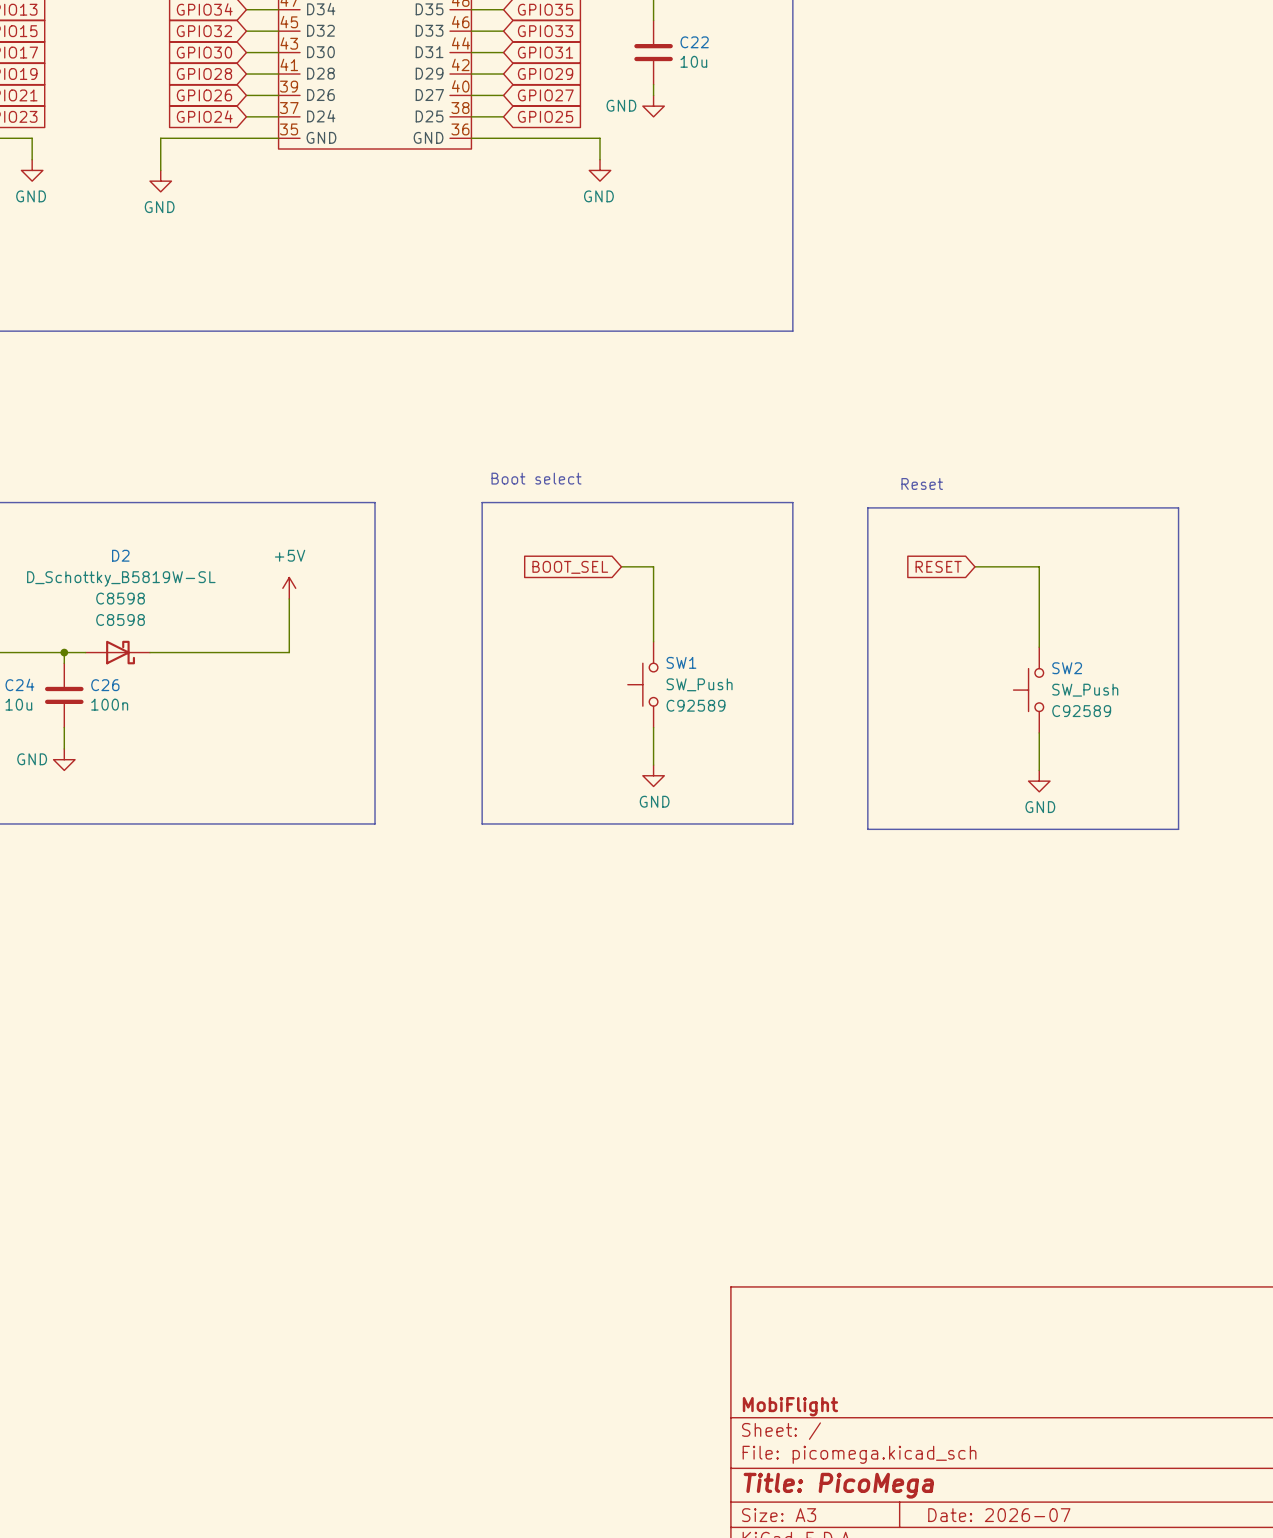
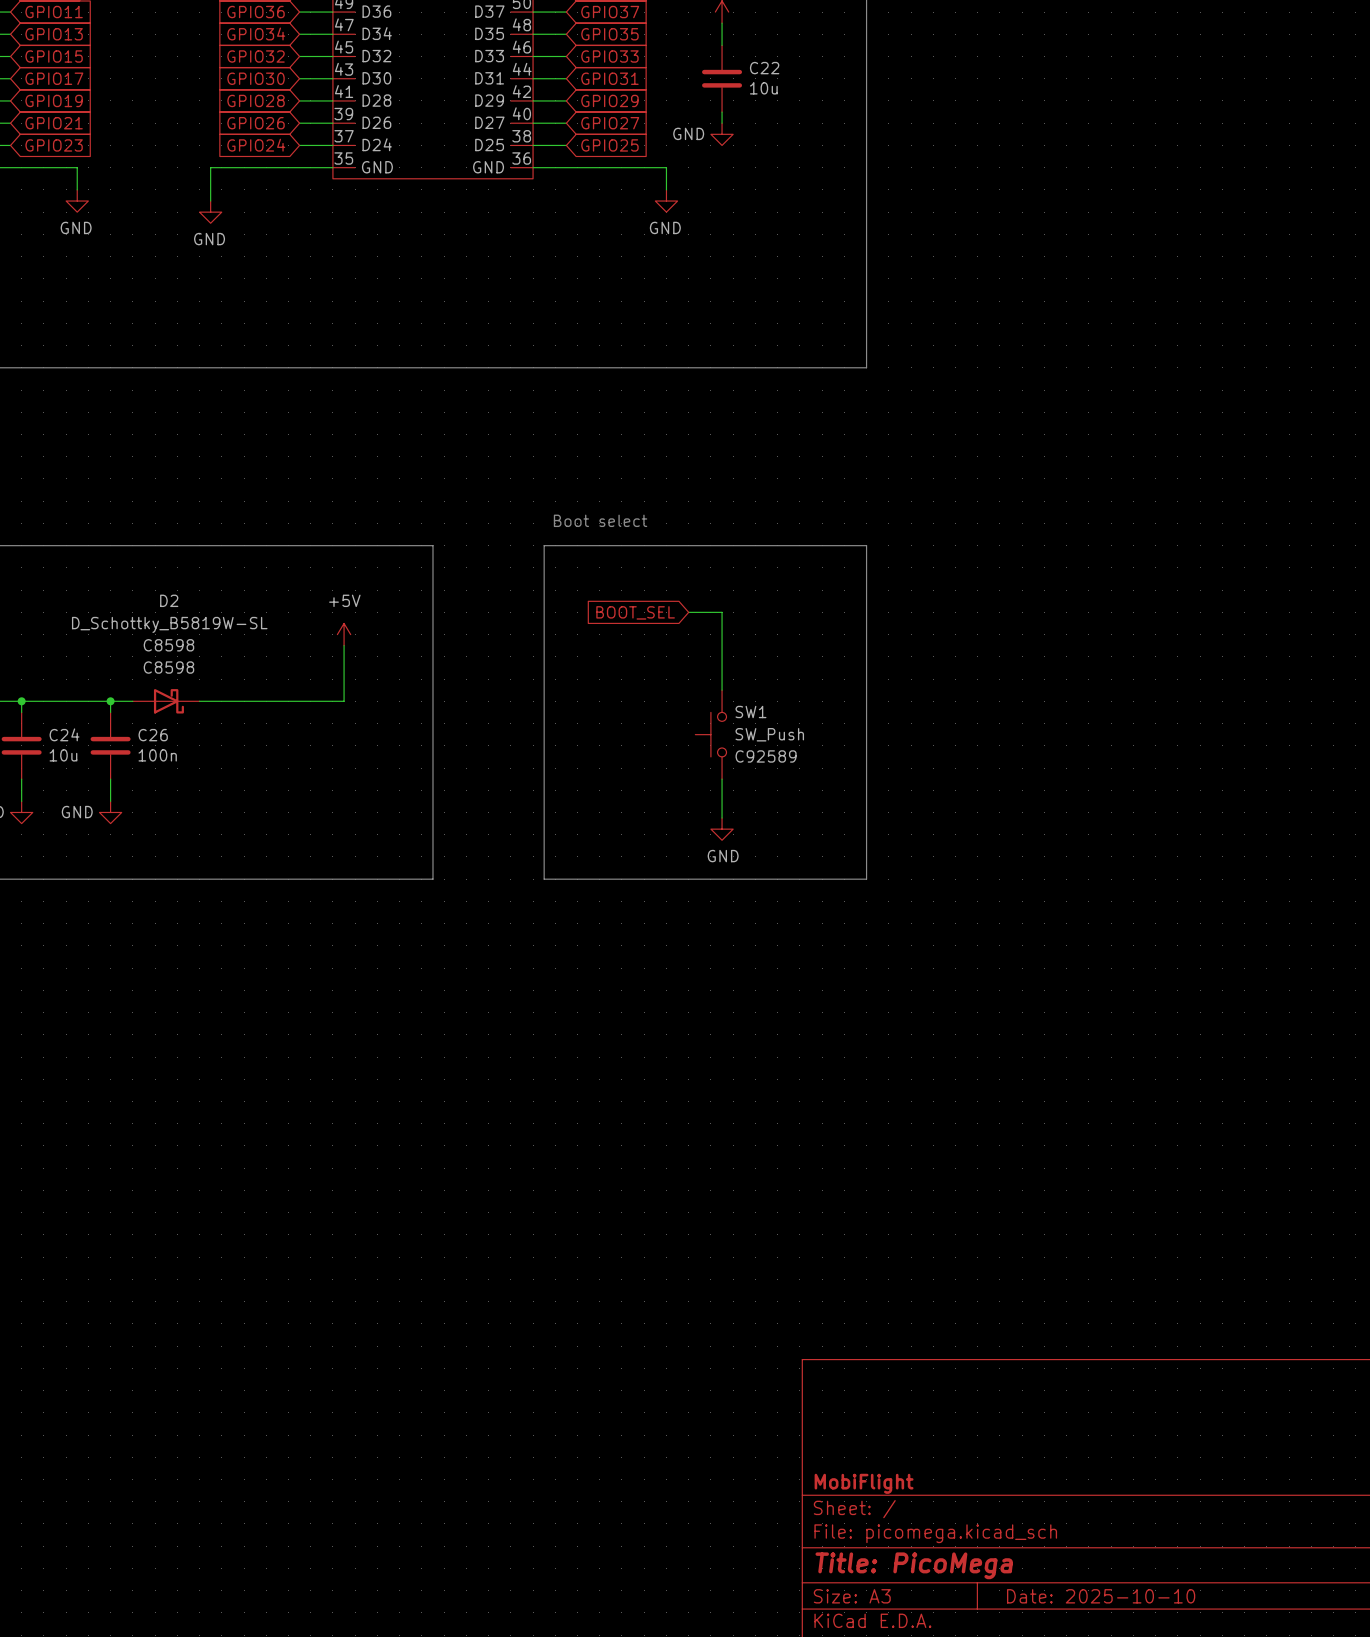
text: Reset (922, 483) -> none
line: (867, 507) (1178, 507) (1178, 829) (867, 829) (867, 507) -> none
global label: RESET (938, 566) -> none
wire: (974, 566) (1039, 566) (1039, 647) -> none
SW2: SW_Push (1028, 690) -> none
wire: (1039, 732) (1039, 770) -> none
power symbol: GND (1039, 781) -> none
title block: Date: 2026-07 (999, 1515) -> Date: 2025-10-10 (1101, 1596)

